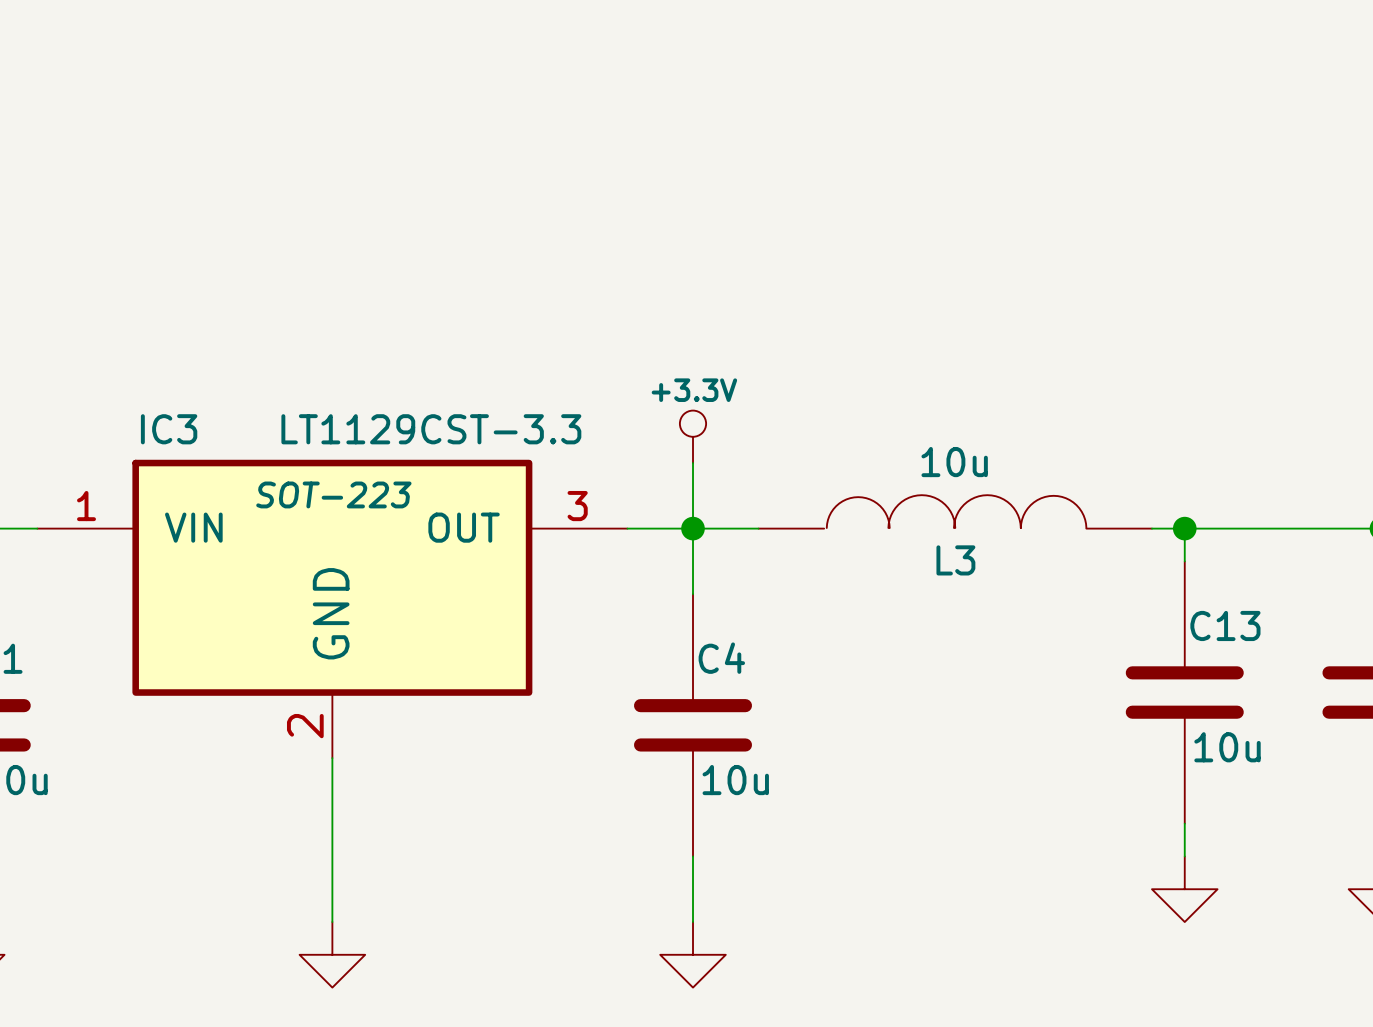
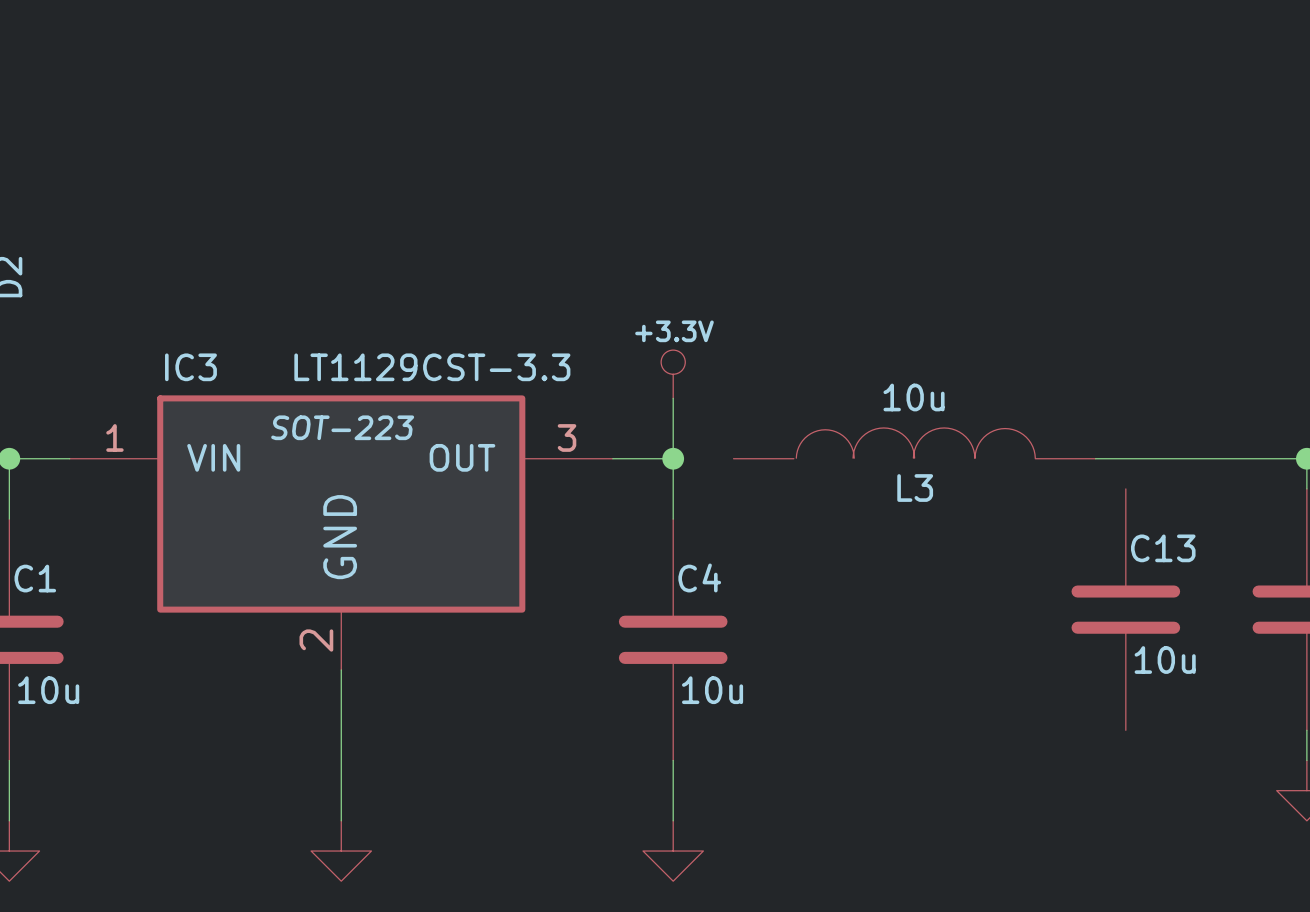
wire: (693, 528) (758, 528) -> none
wire: (1184, 528) (1184, 561) -> none
junction: (1184, 528) -> none
wire: (1184, 823) (1184, 856) -> none
power symbol: (1184, 889) -> none

